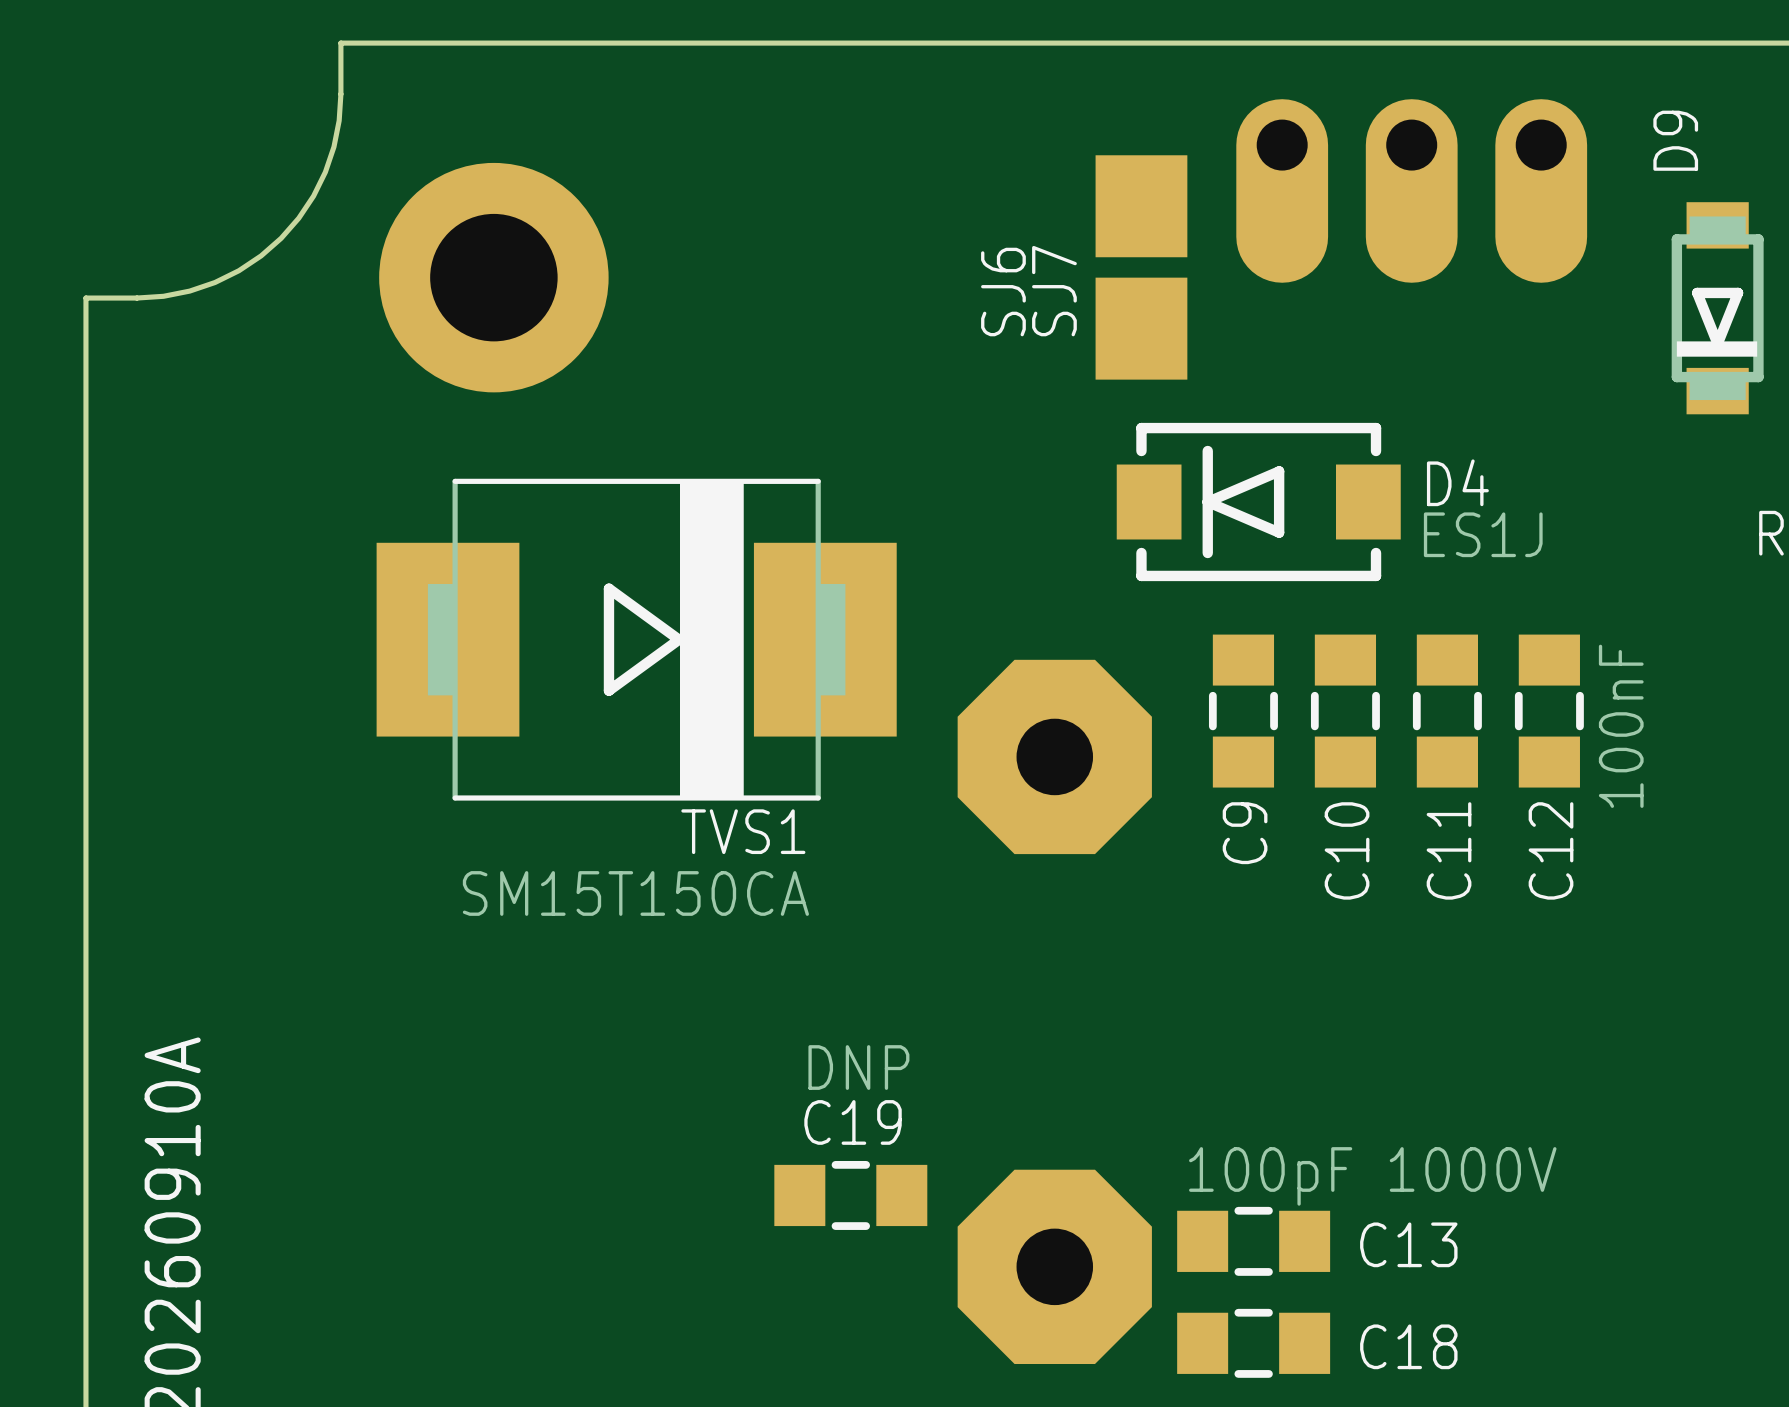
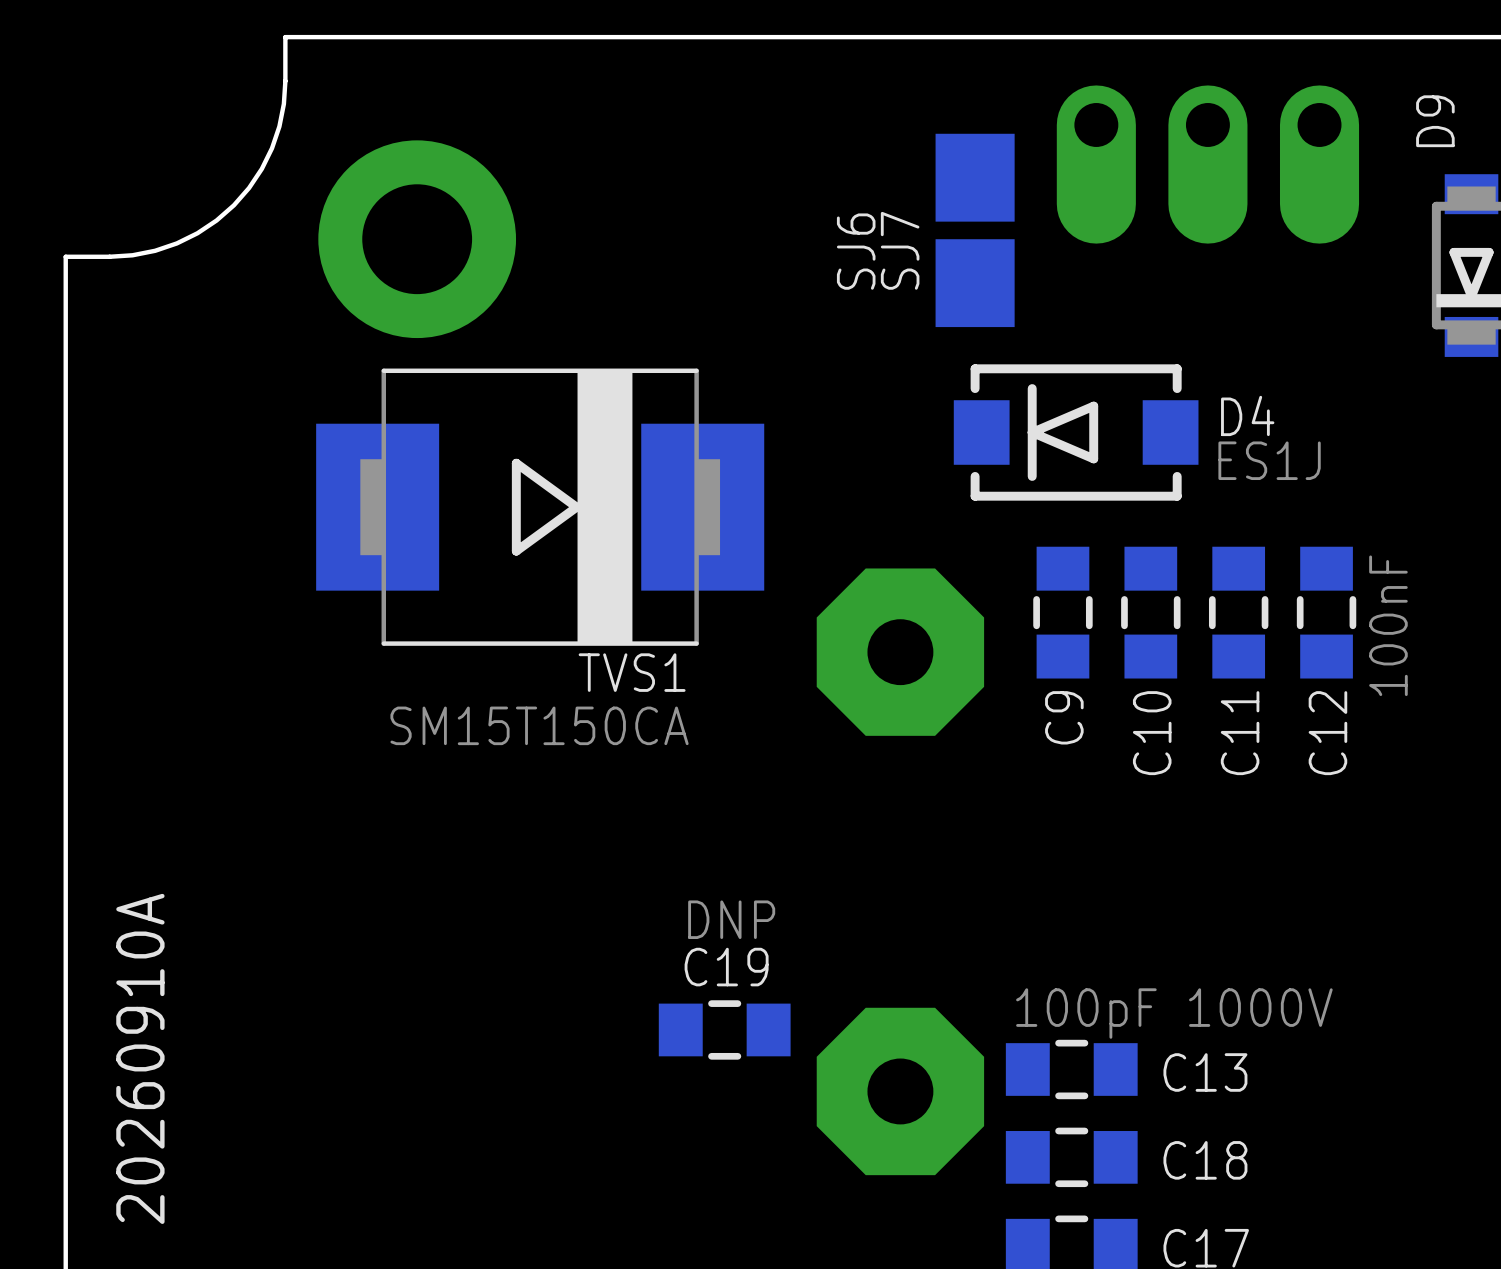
TVS1 position: (636, 639) -> (540, 507)

